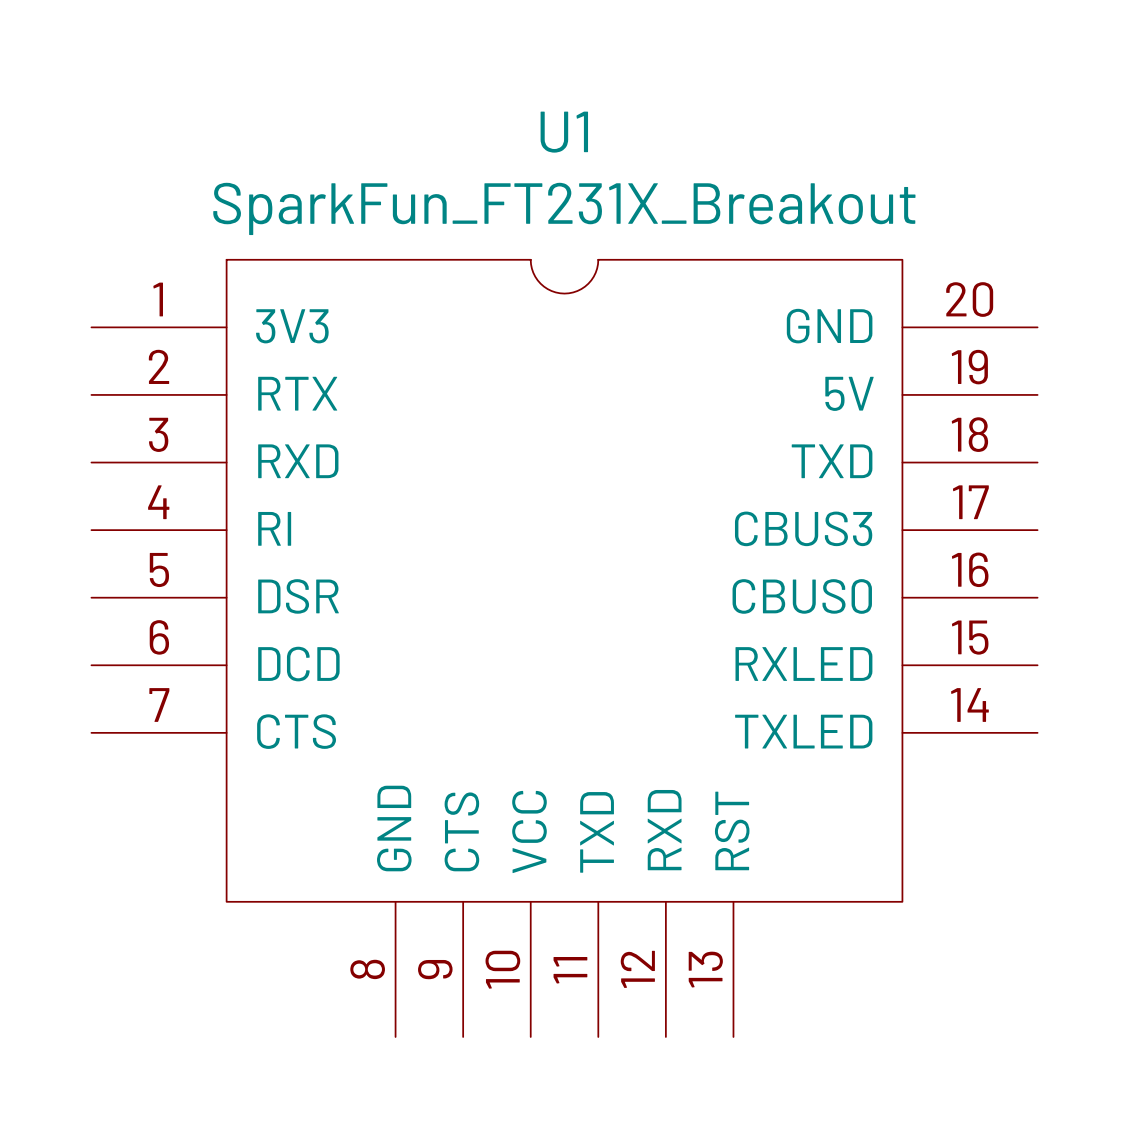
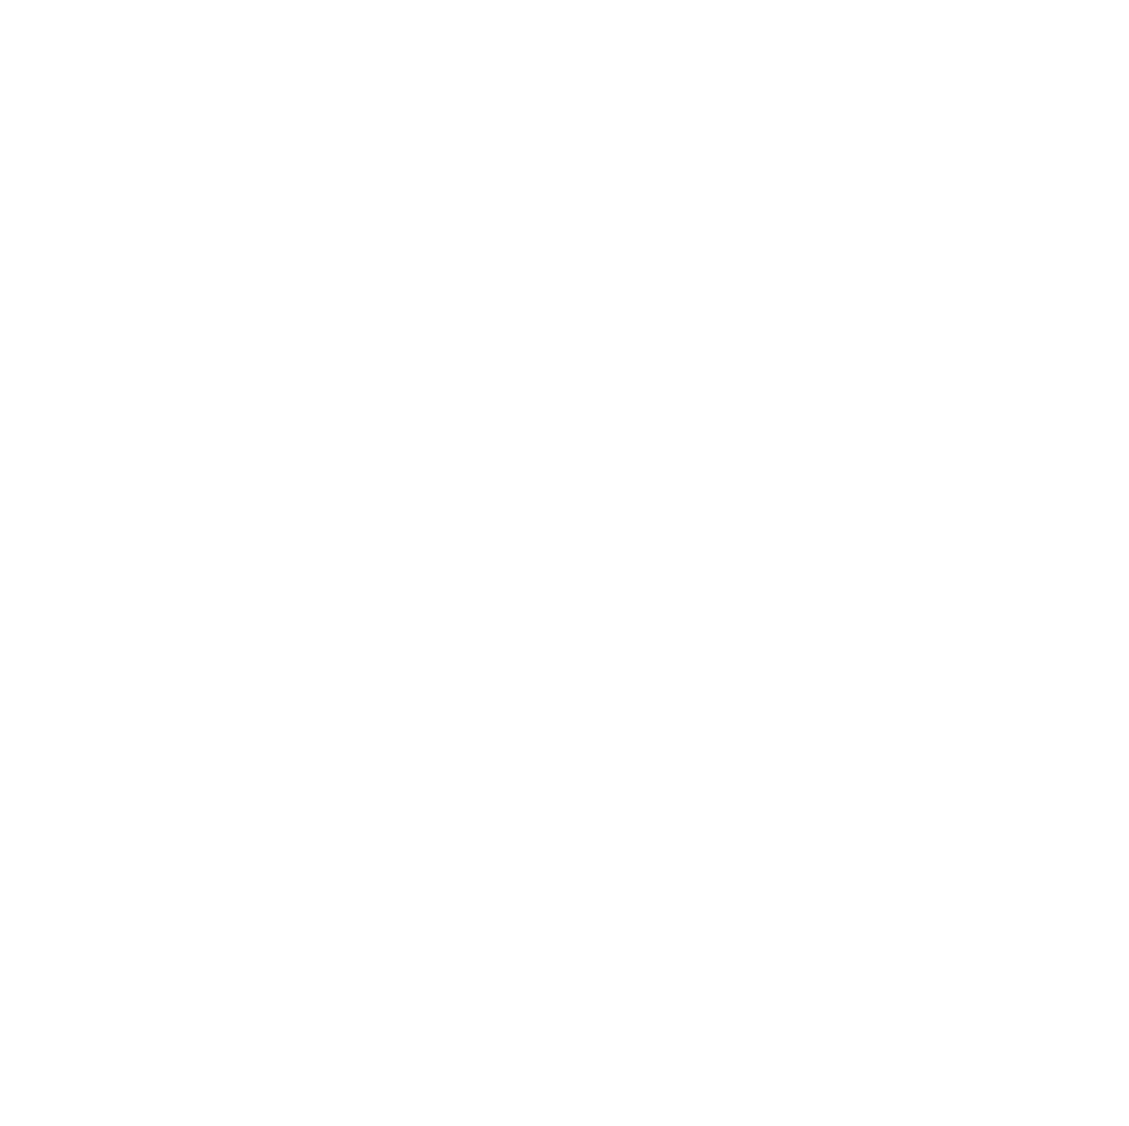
U1: SparkFun_FT231X_Breakout (564, 648) -> none

